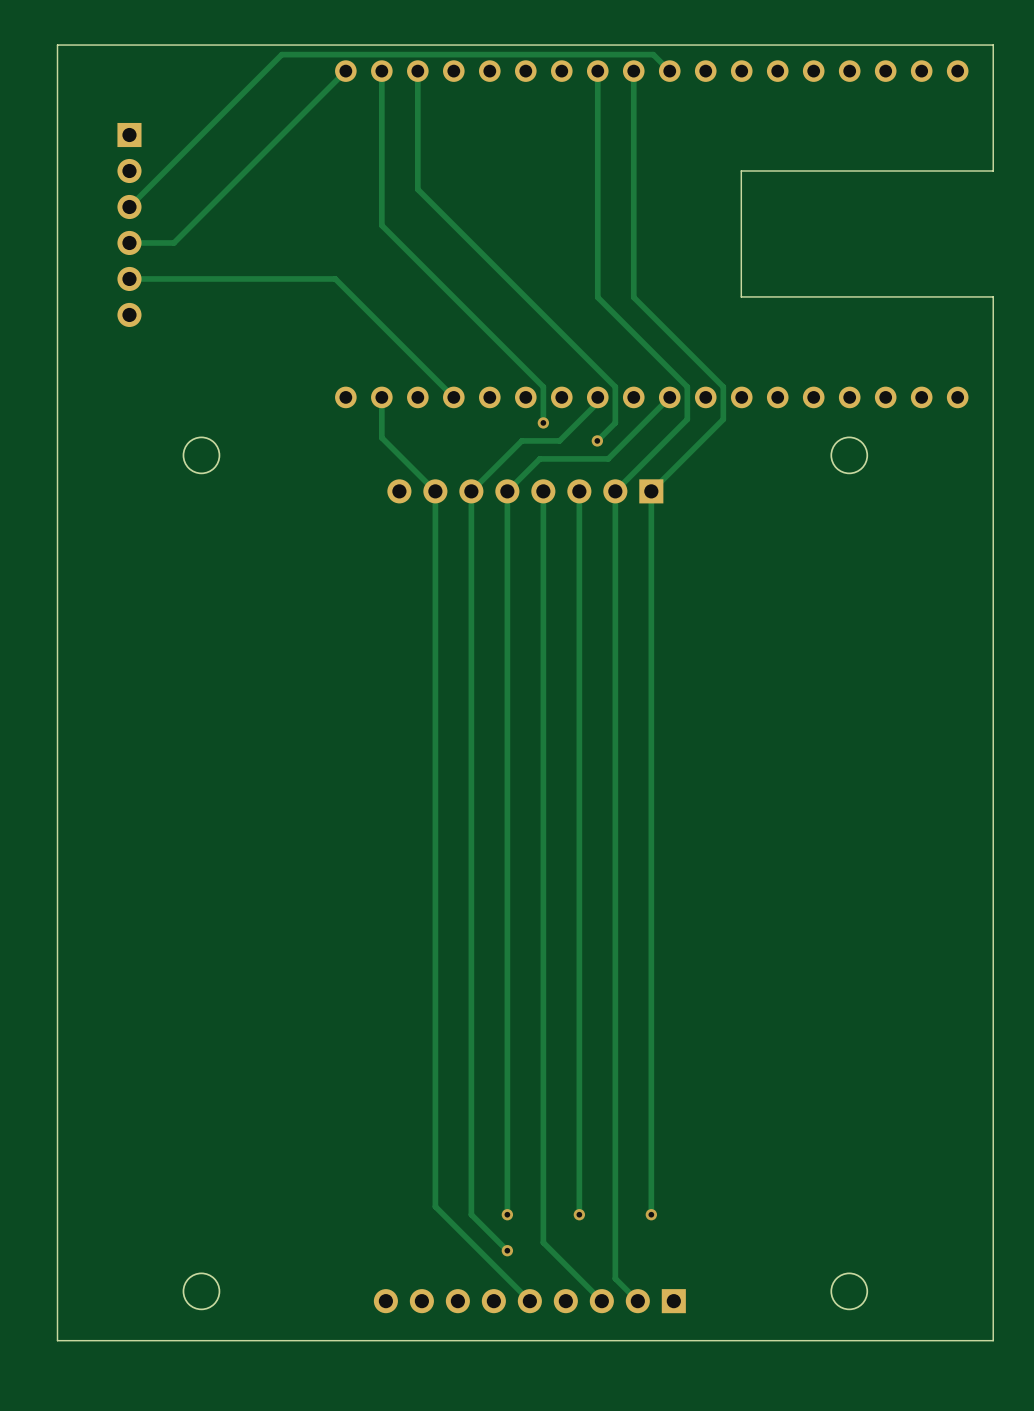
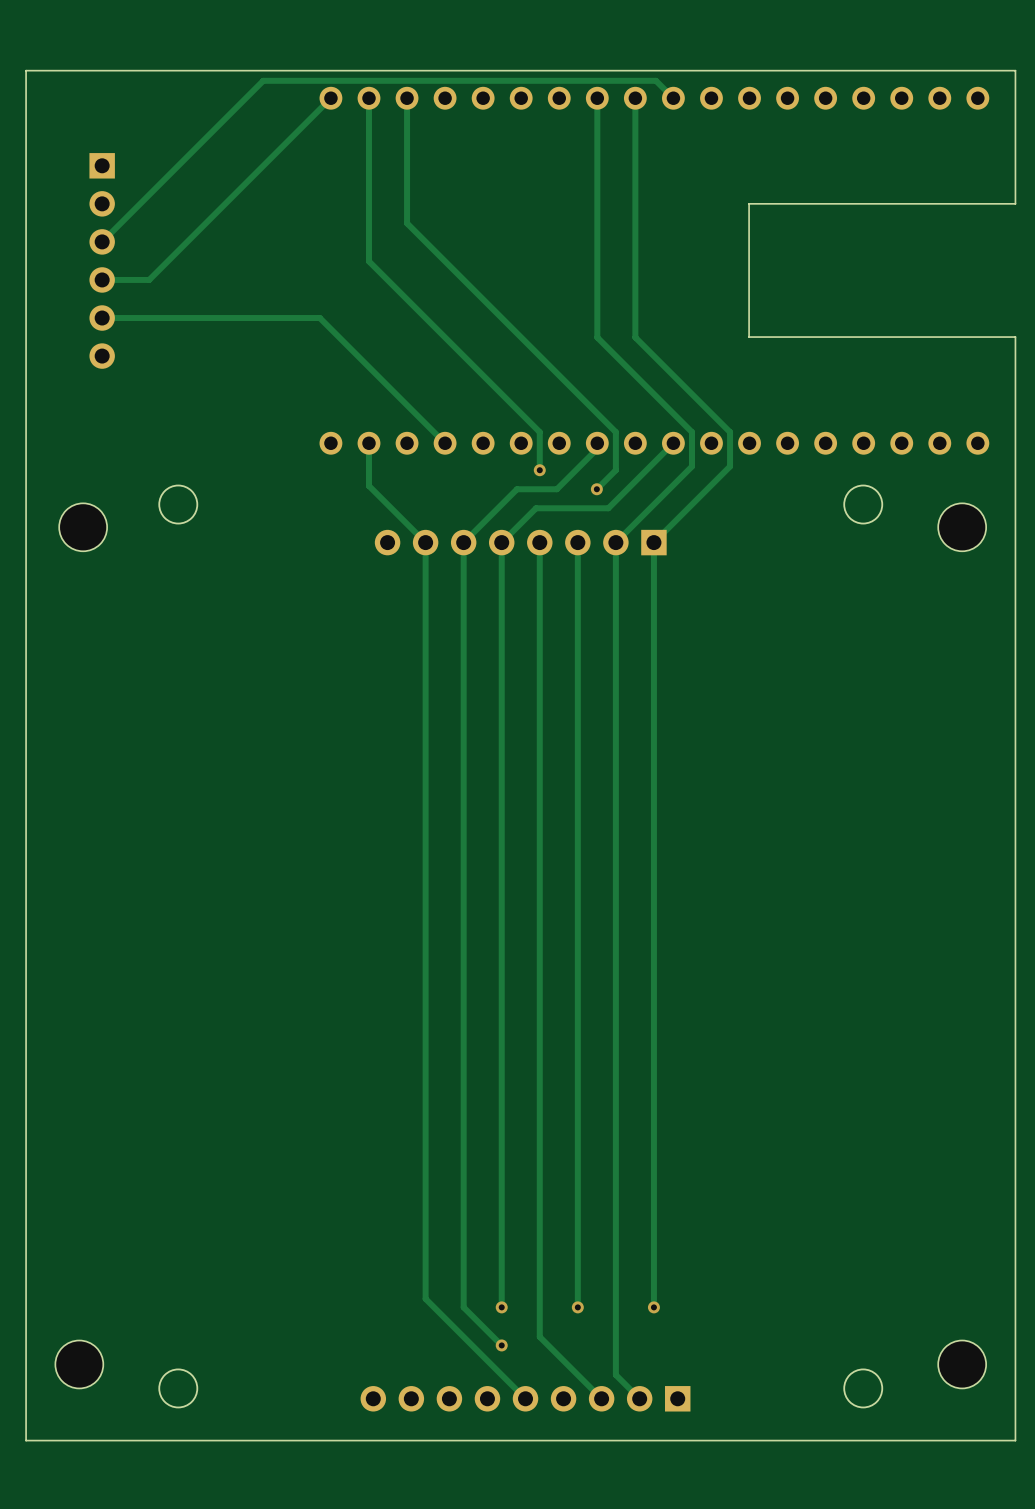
part: none -> (83, 527)
part: none -> (962, 527)
part: none -> (79, 1364)
part: none -> (962, 1364)

